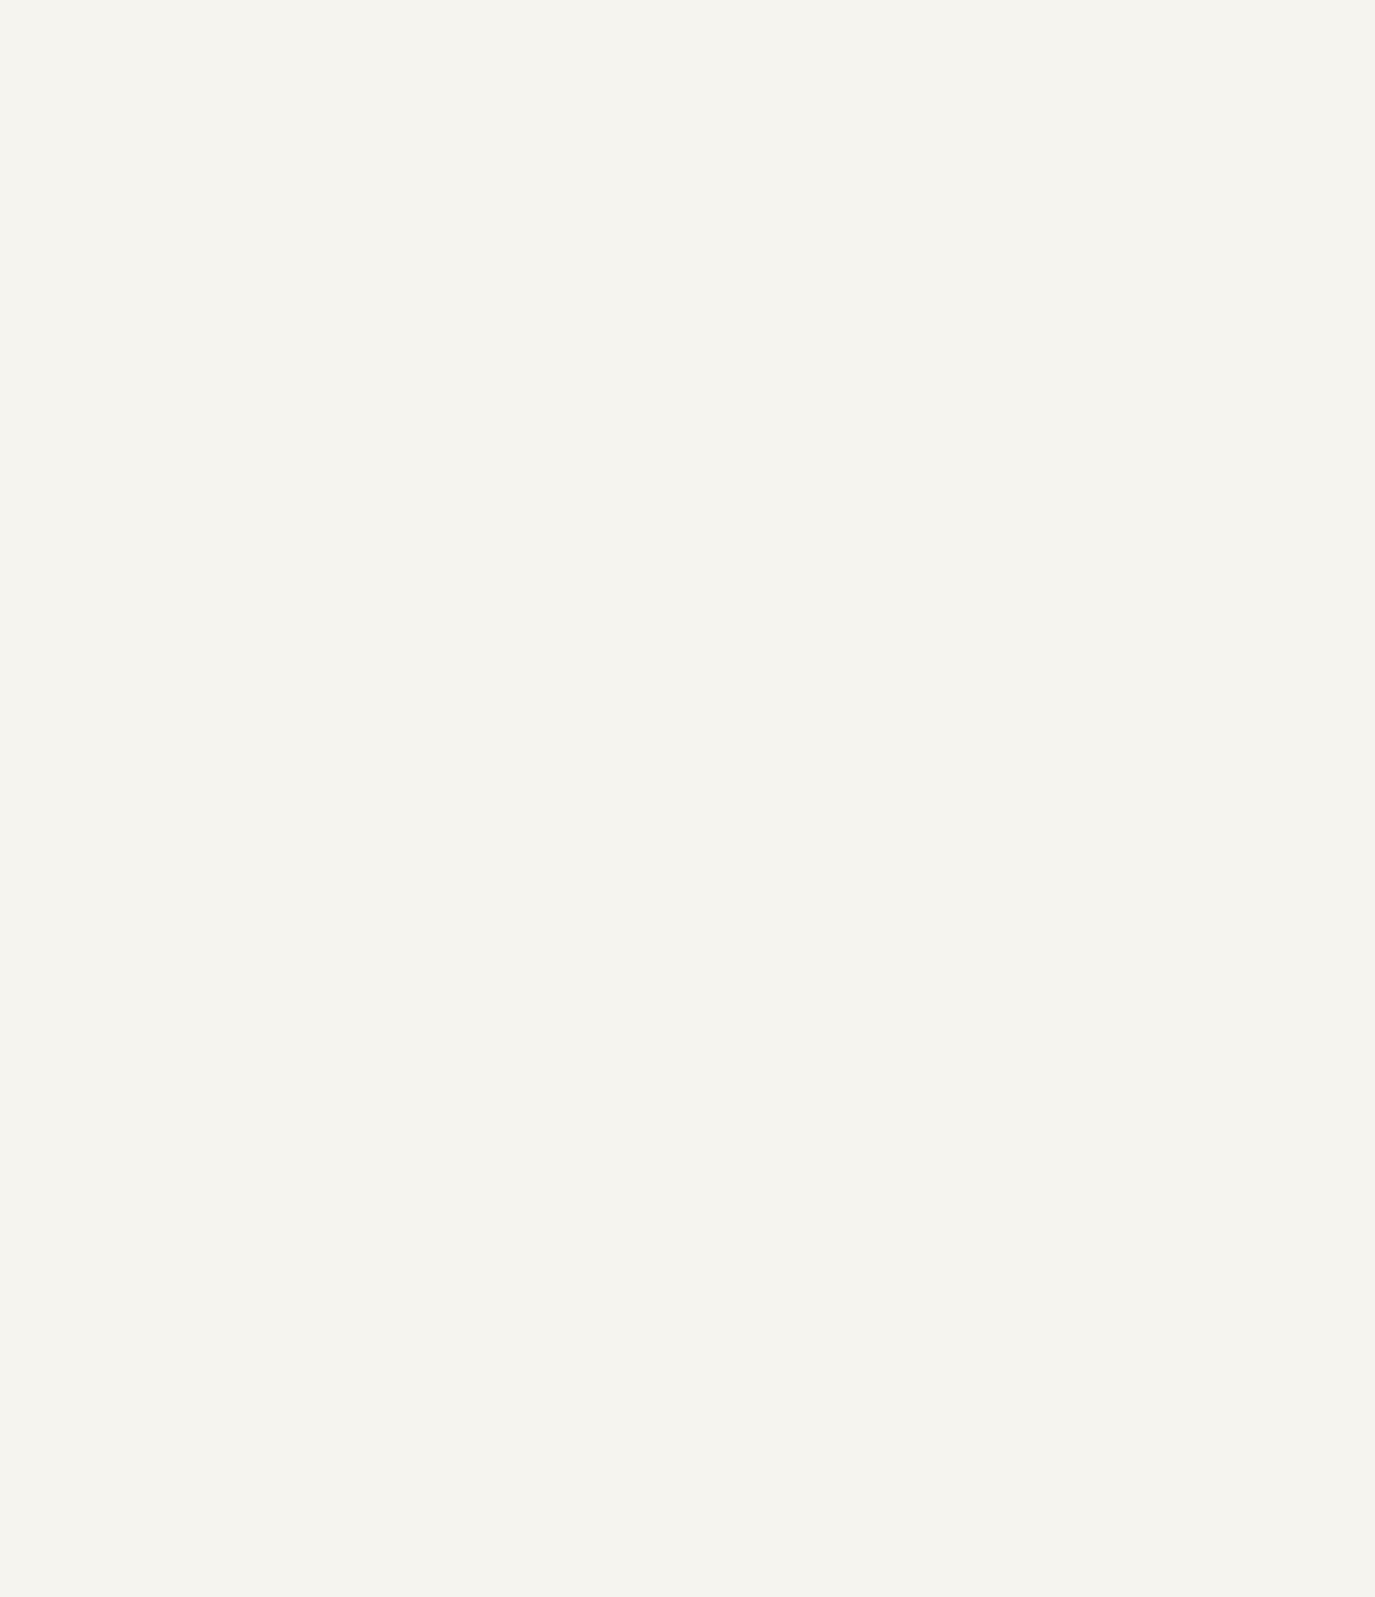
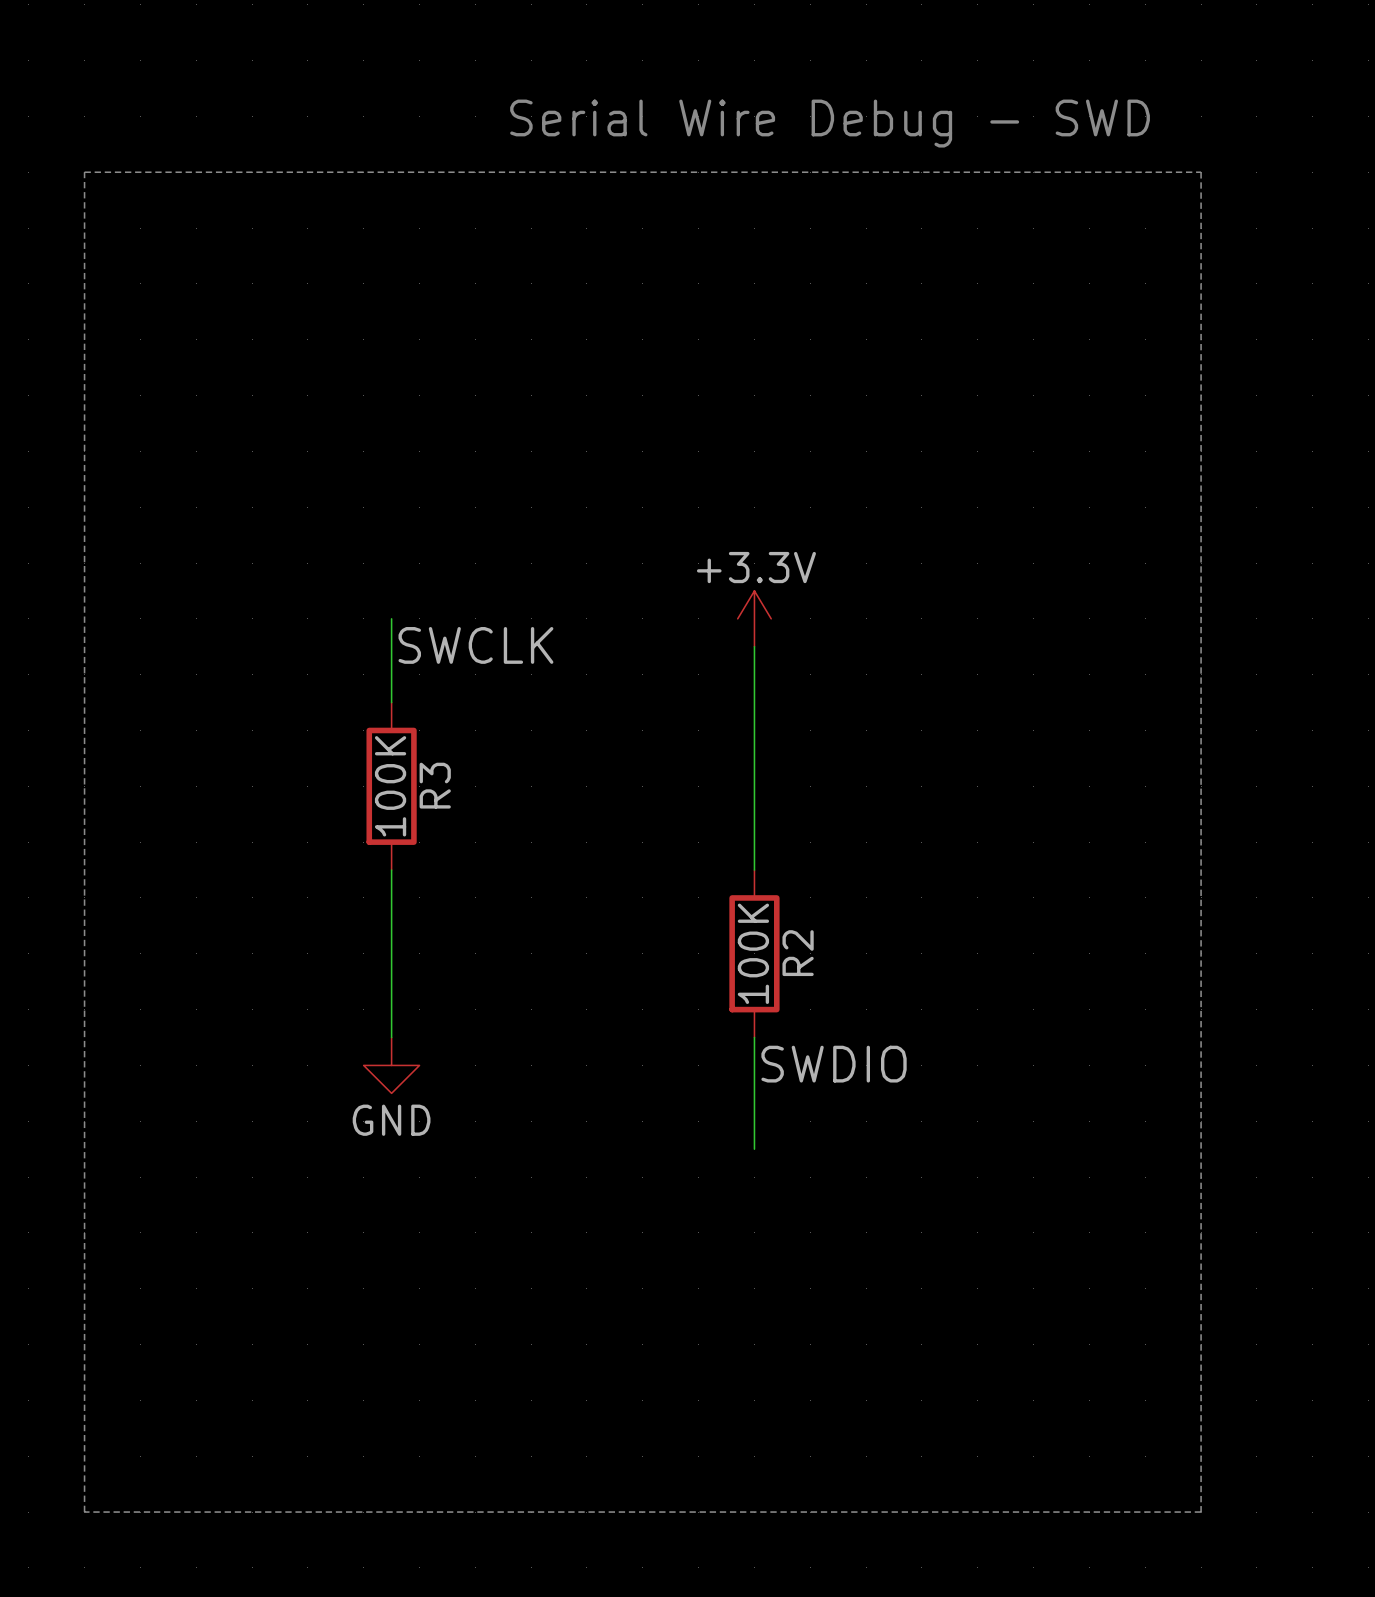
text: none -> Serial Wire Debug - SWD (830, 123)
line: none -> (84, 172) (1201, 172) (1201, 1512) (84, 1512) (84, 172)
wire: none -> (391, 618) (391, 702)
power symbol: none -> +3.3V (754, 618)
label: none -> SWCLK (475, 645)
wire: none -> (754, 646) (754, 870)
R3: none -> 100K (391, 786)
wire: none -> (391, 870) (391, 1037)
R2: none -> 100K (754, 953)
wire: none -> (754, 1037) (754, 1149)
label: none -> SWDIO (834, 1064)
power symbol: none -> GND (391, 1065)

